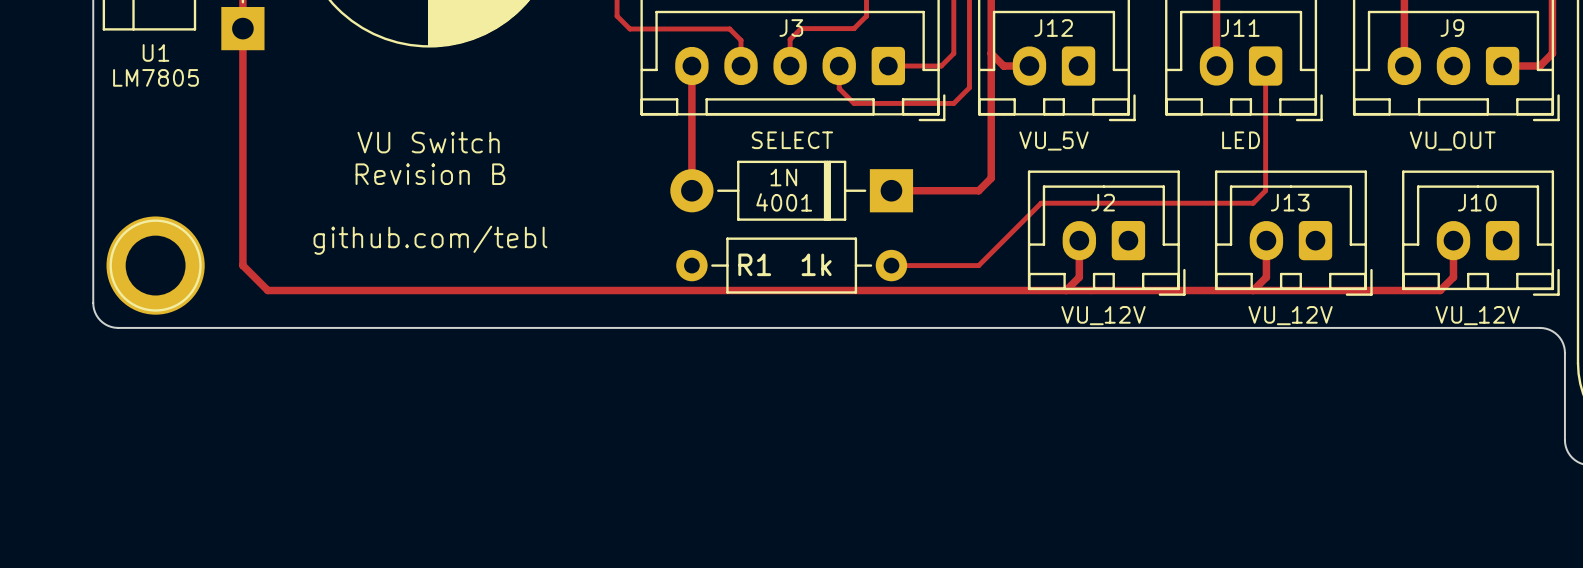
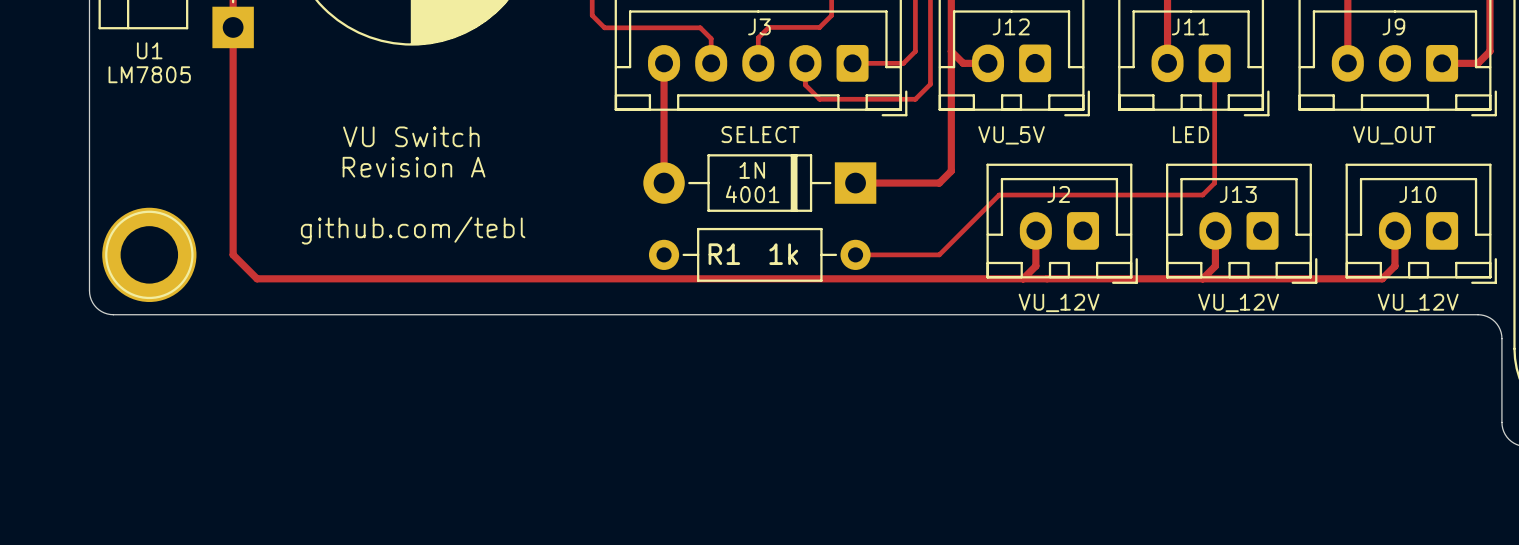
text: Revision B (430, 174) -> Revision A (414, 167)

